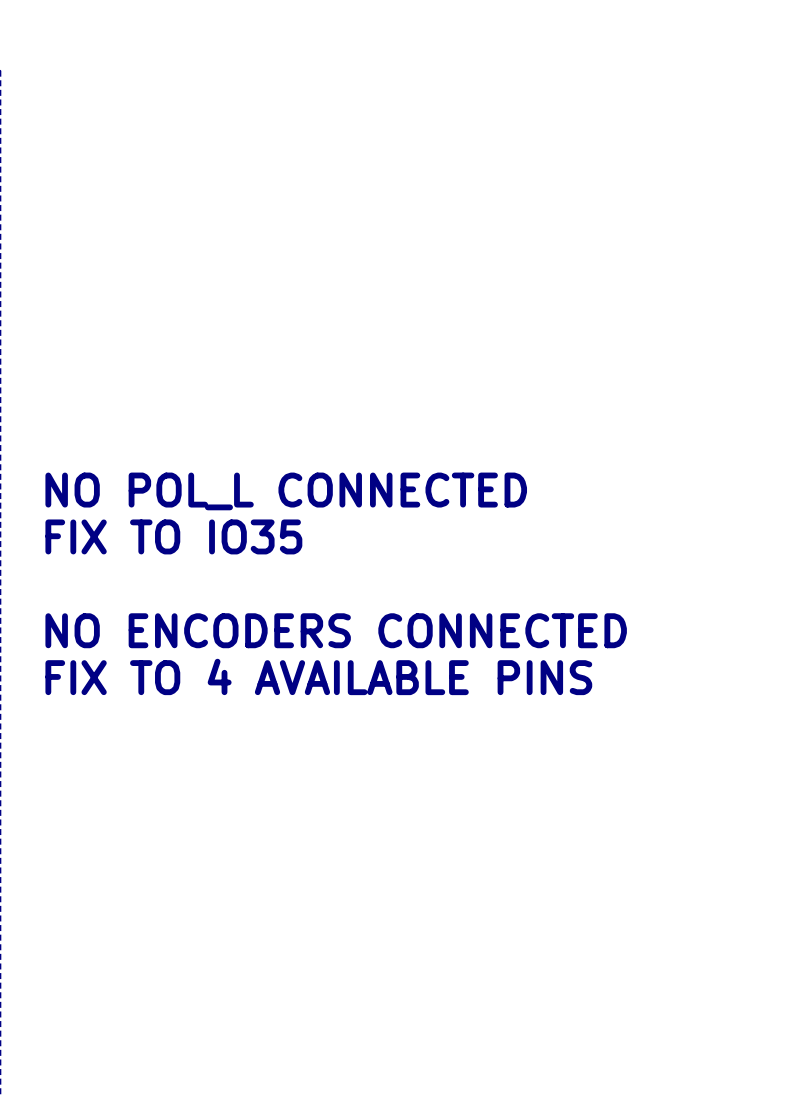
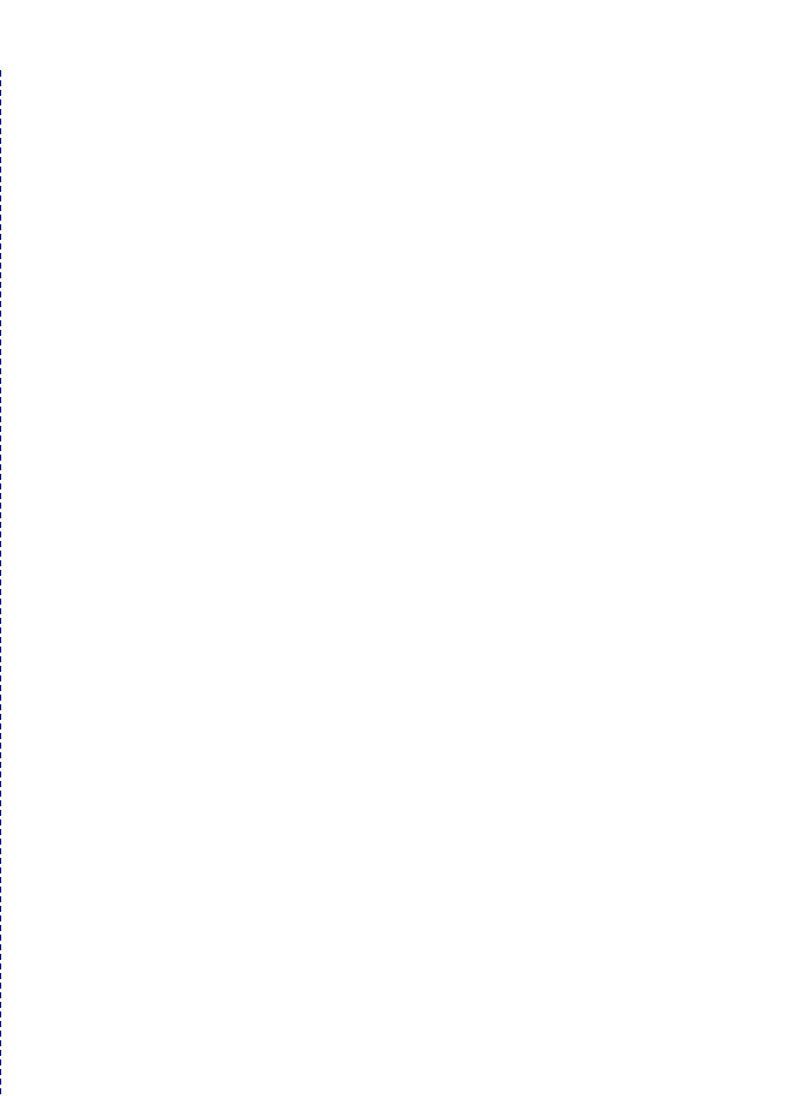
text: NO POL_L CONNECTED (286, 491) -> none
text: FIX TO IO35 (173, 536) -> none
text: NO ENCODERS CONNECTED (336, 630) -> none
text: FIX TO 4 AVAILABLE PINS (318, 676) -> none

